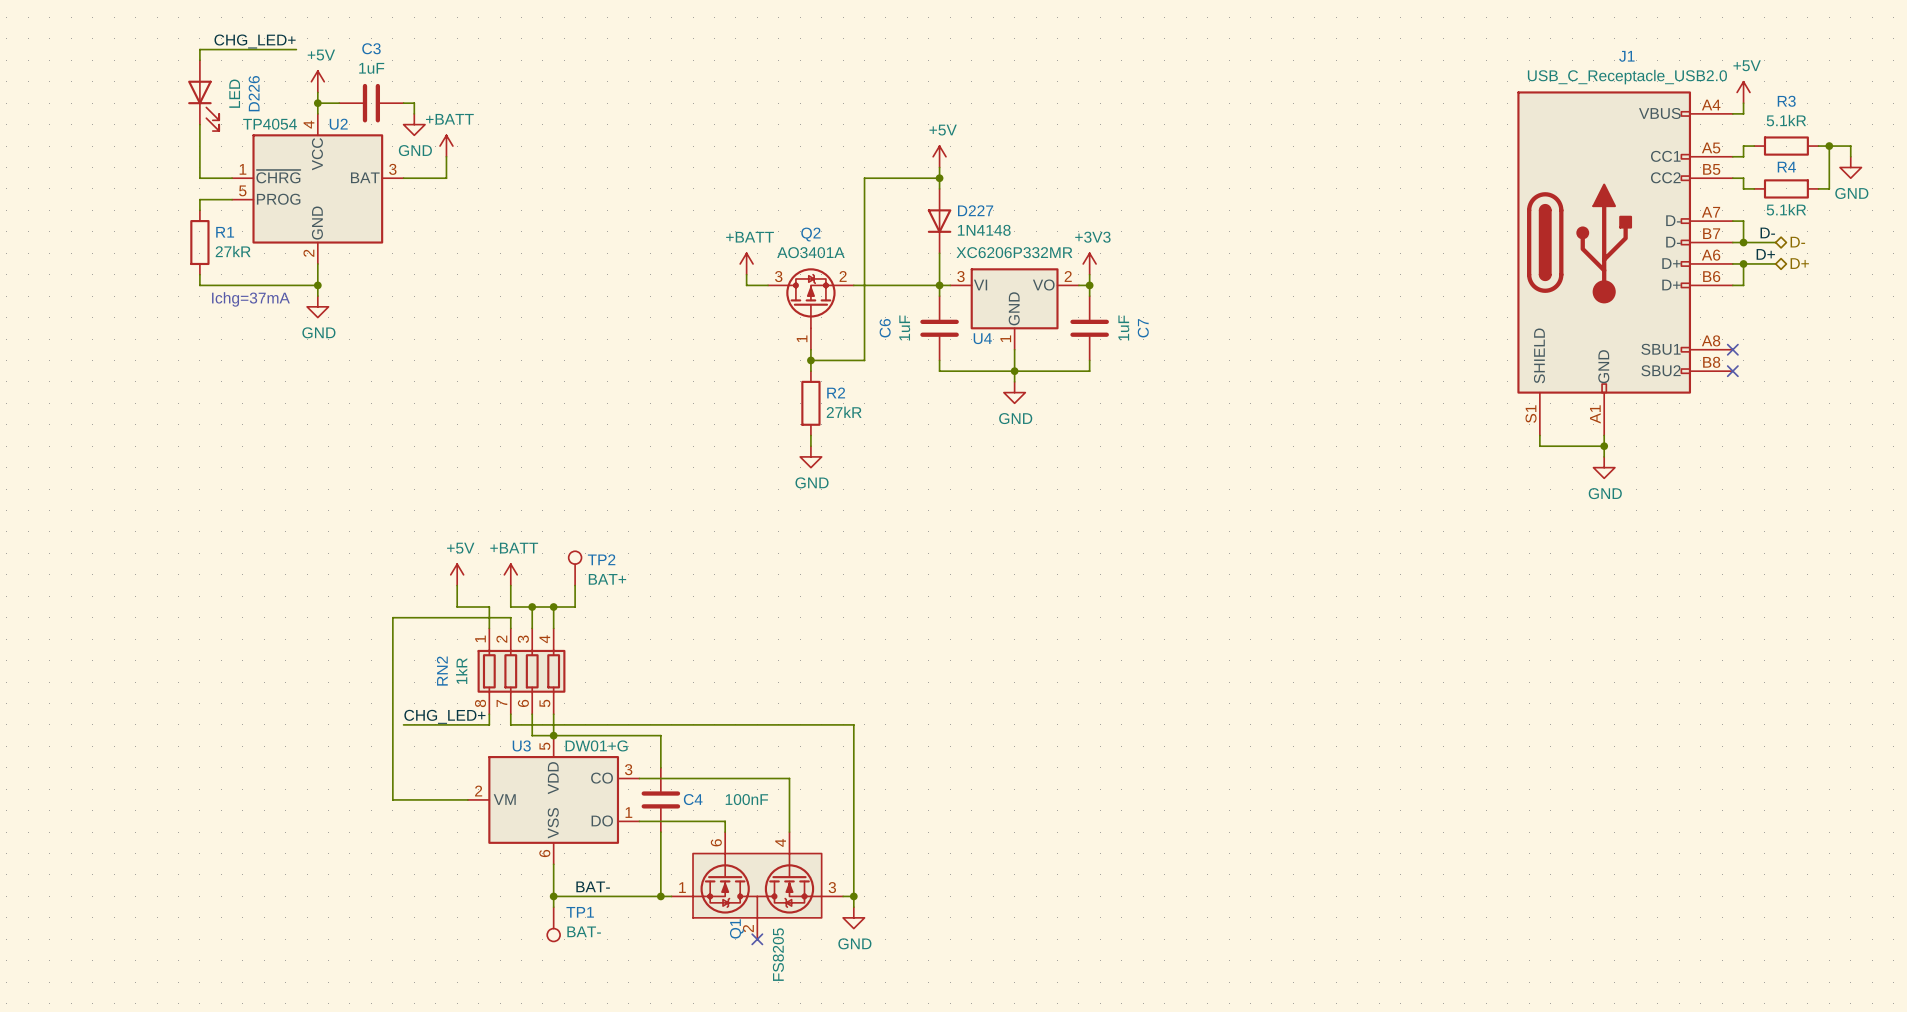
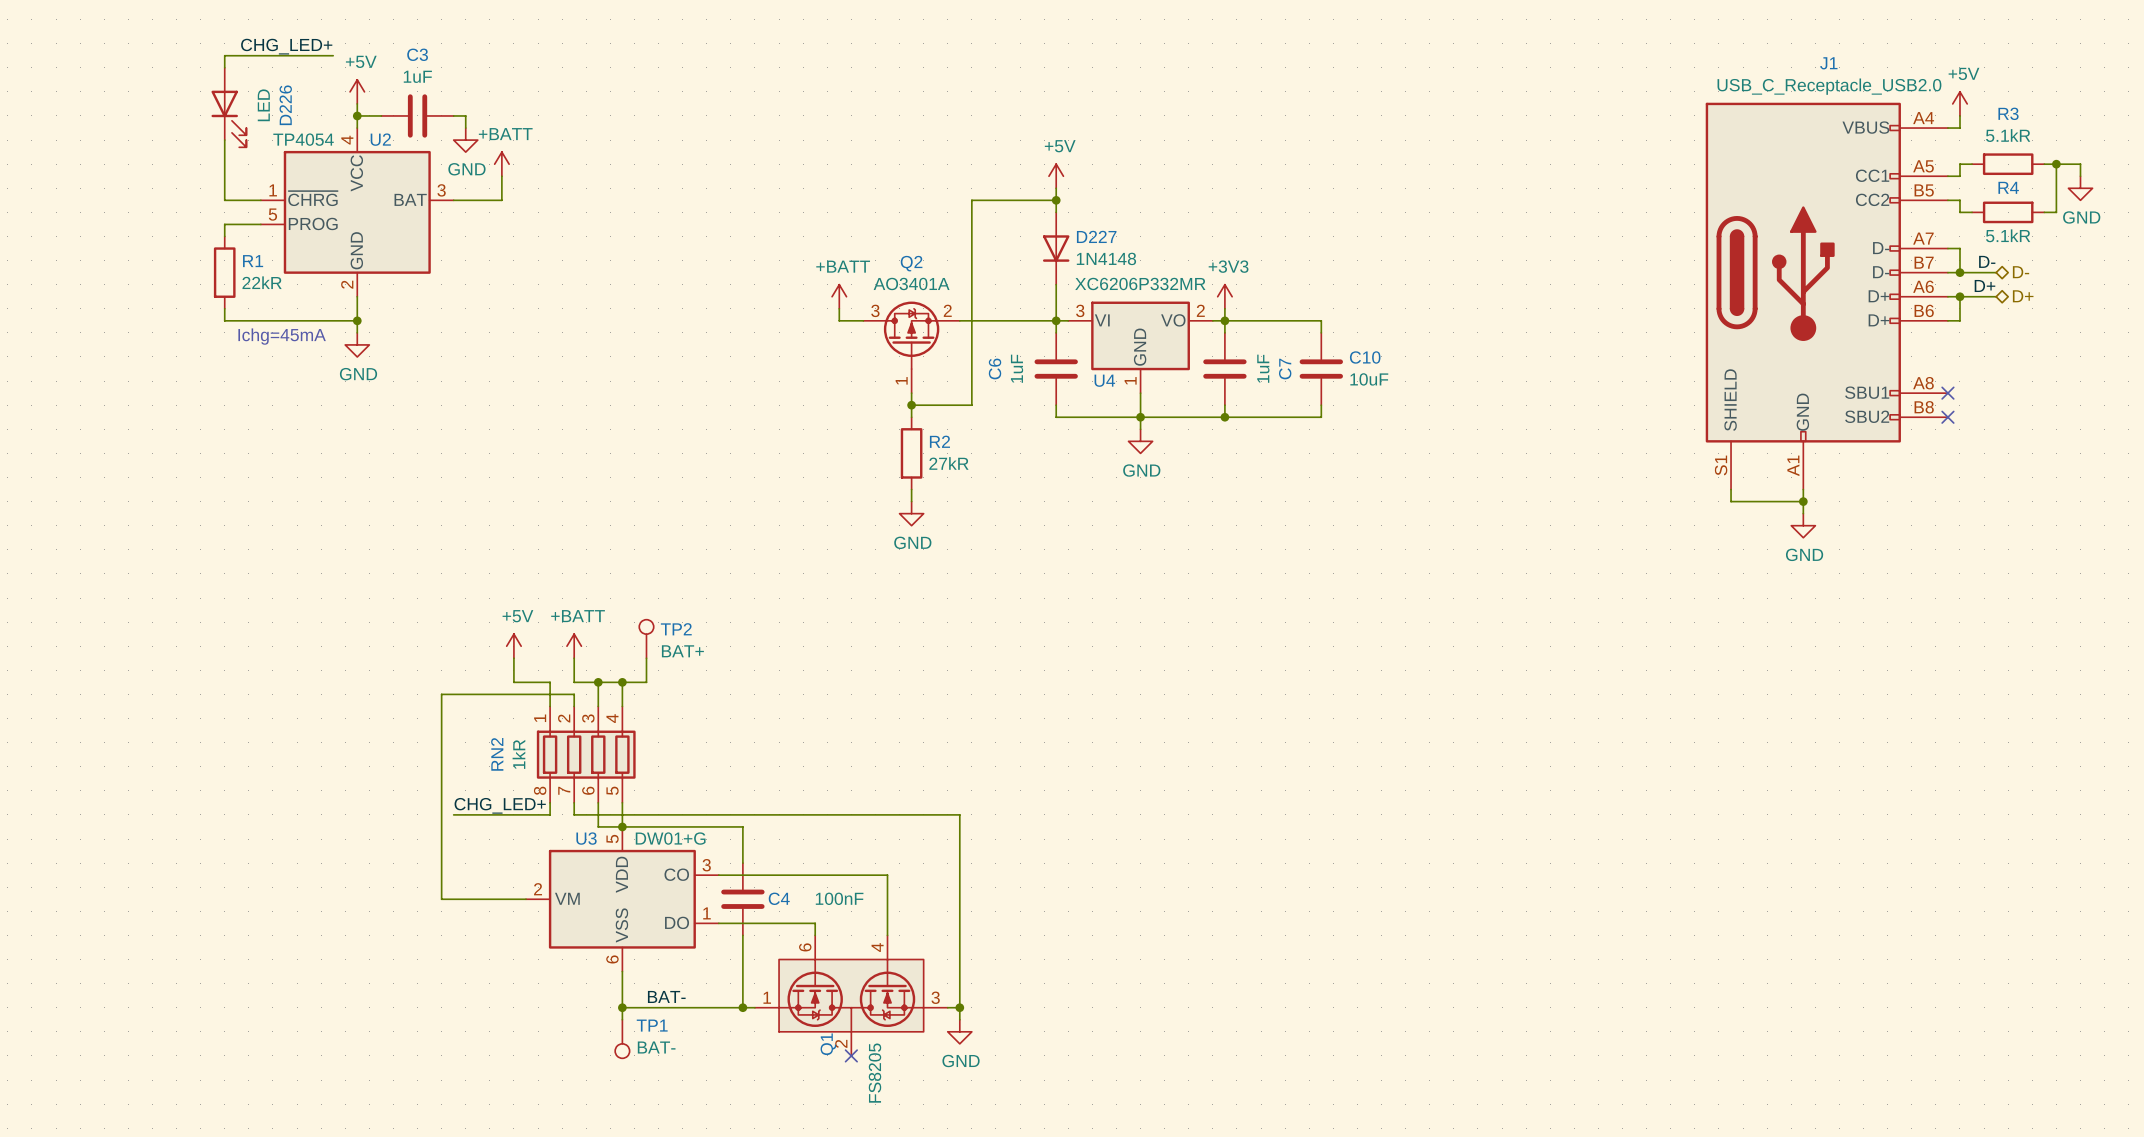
R1 value: 27kR (233, 251) -> 22kR (262, 282)
wire: none -> (1224, 320) (1321, 320) (1321, 332)
text: Ichg=37mA (250, 299) -> Ichg=45mA (282, 336)
C10: none -> 10uF (1321, 369)
wire: none -> (1321, 405) (1321, 417) (1224, 417)
junction: none -> (1224, 417)

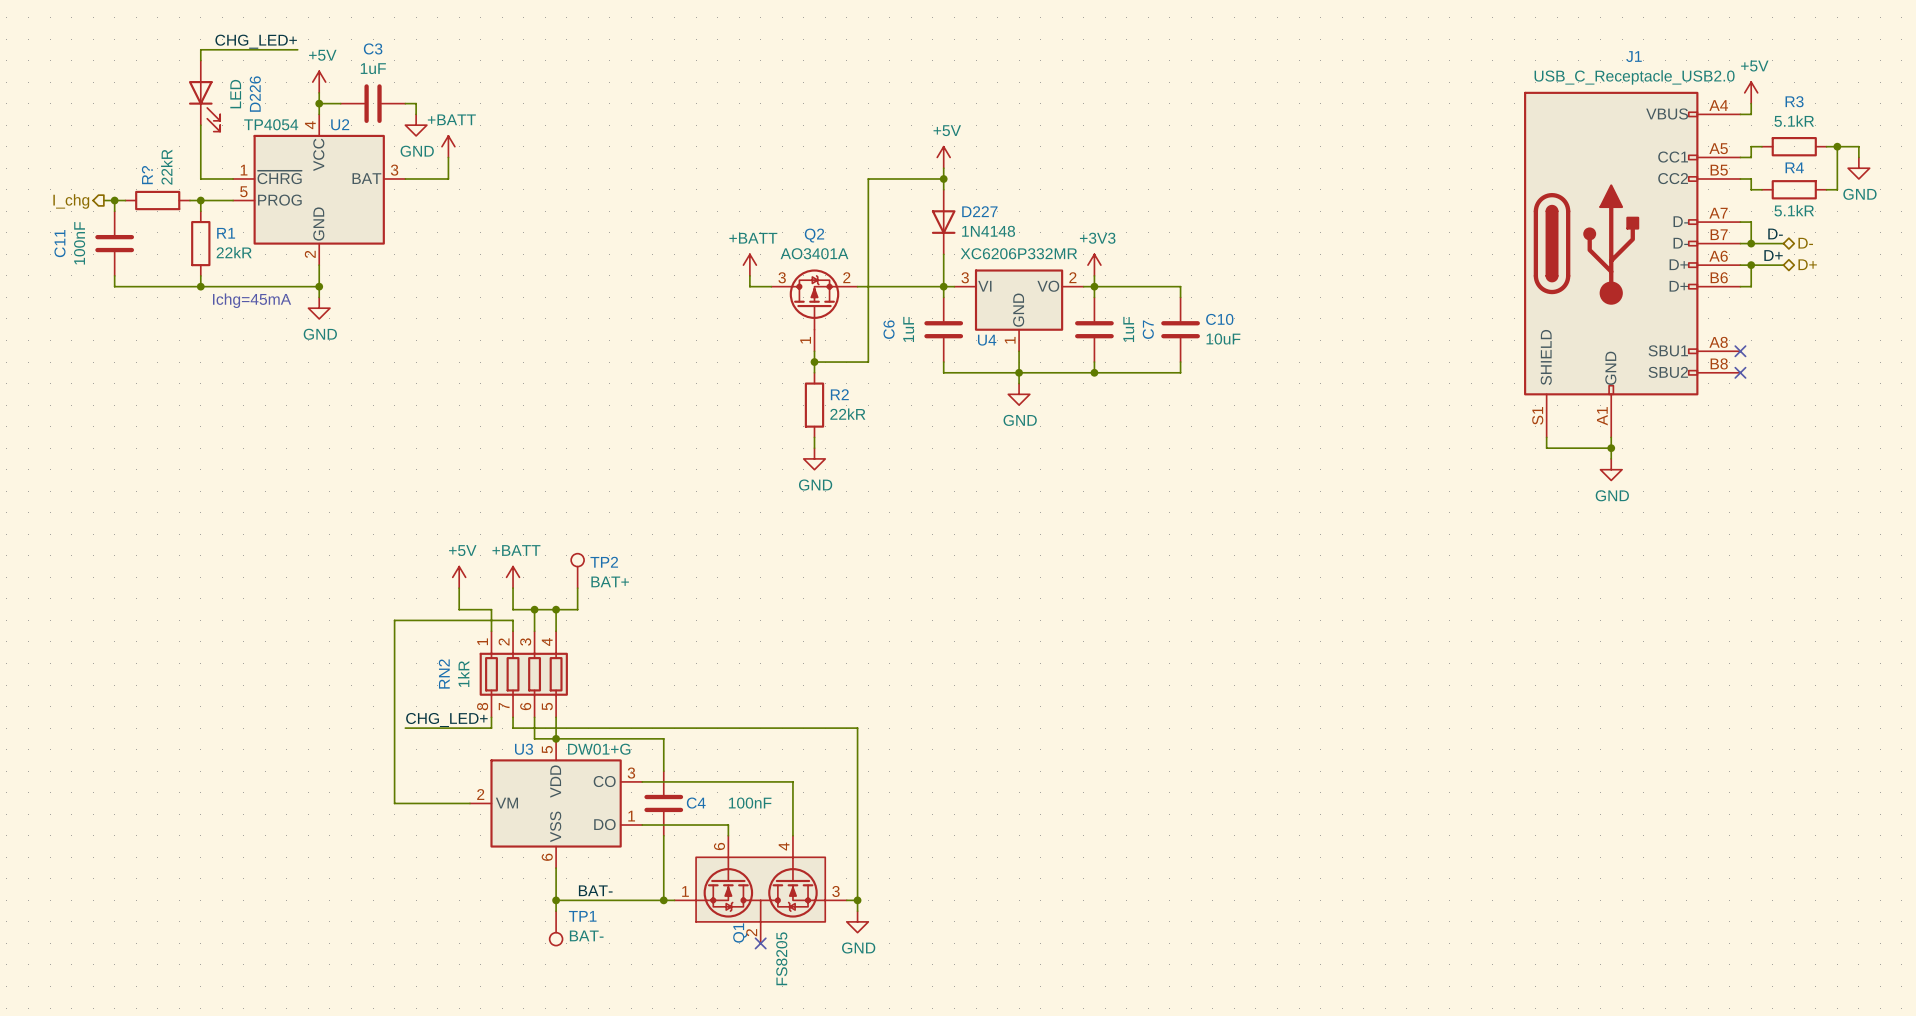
wire: none -> (103, 200) (125, 200)
wire: none -> (114, 200) (114, 211)
junction: none -> (114, 200)
R?: none -> 22kR (157, 200)
wire: none -> (190, 200) (200, 200)
junction: none -> (200, 200)
hierarchical label: none -> I_chg (71, 201)
C11: none -> 100nF (114, 243)
wire: none -> (114, 275) (114, 286) (200, 286)
junction: none -> (200, 286)
R2 value: 27kR (948, 463) -> 22kR (847, 414)

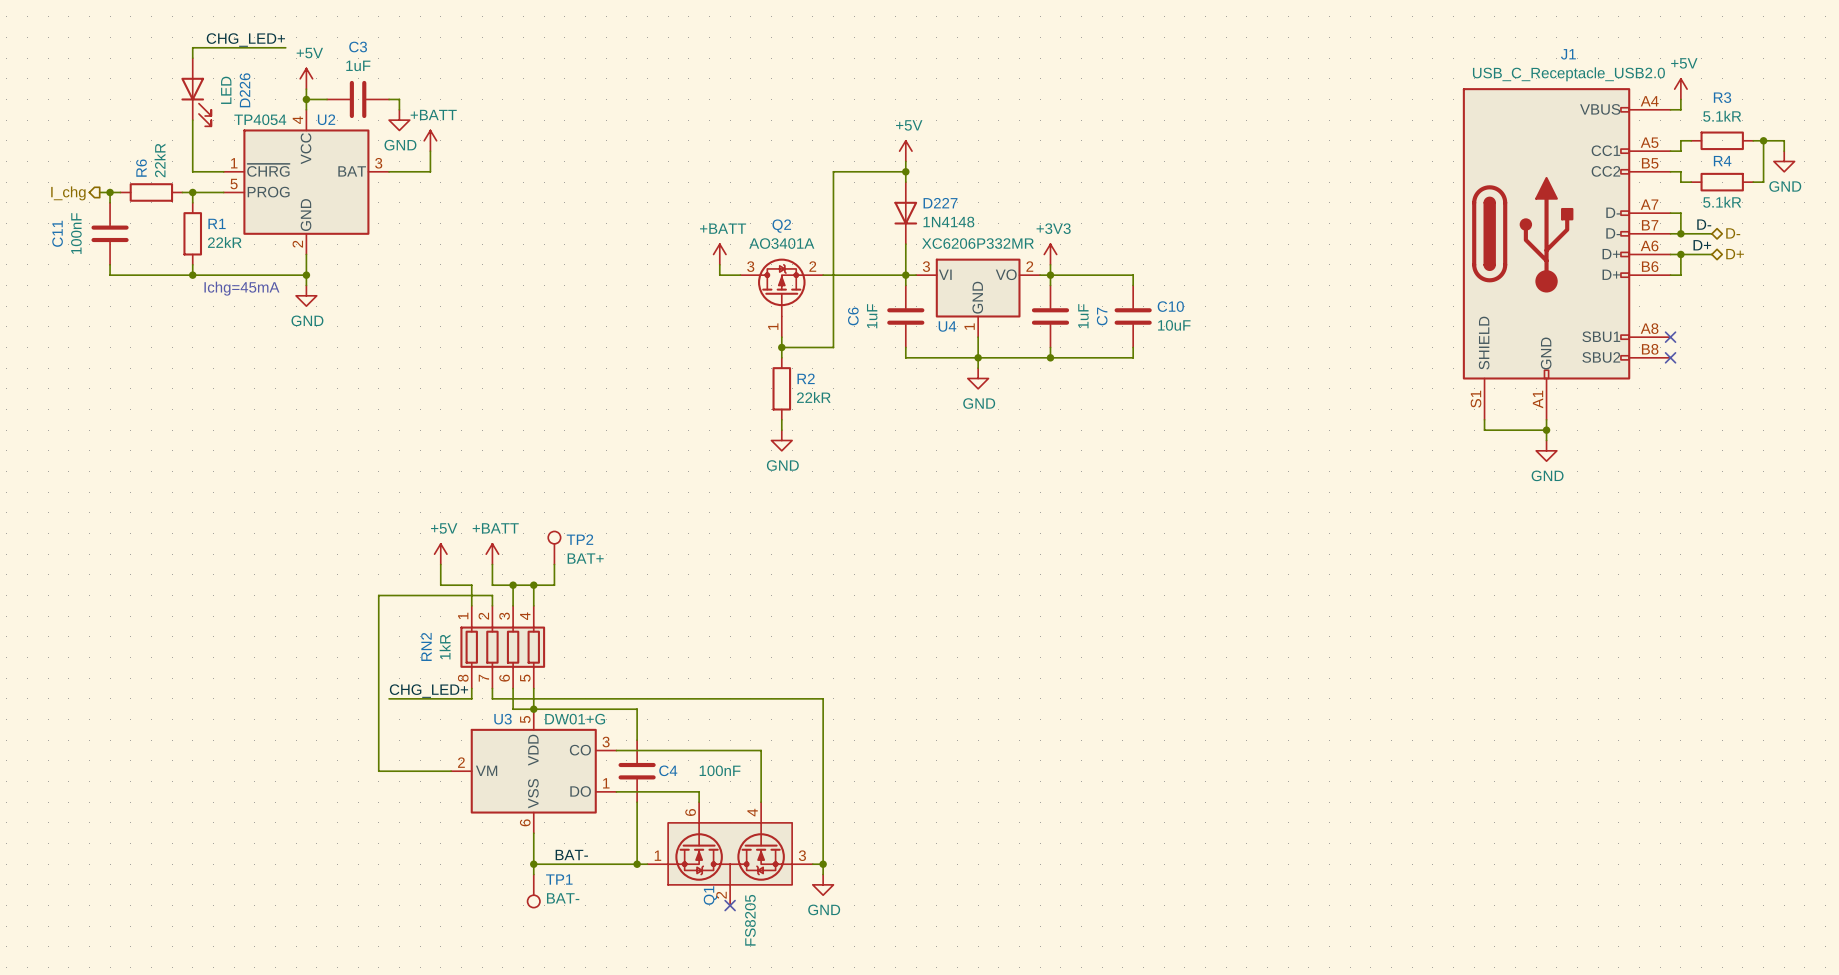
R? name: R? (147, 175) -> R6 (141, 168)

